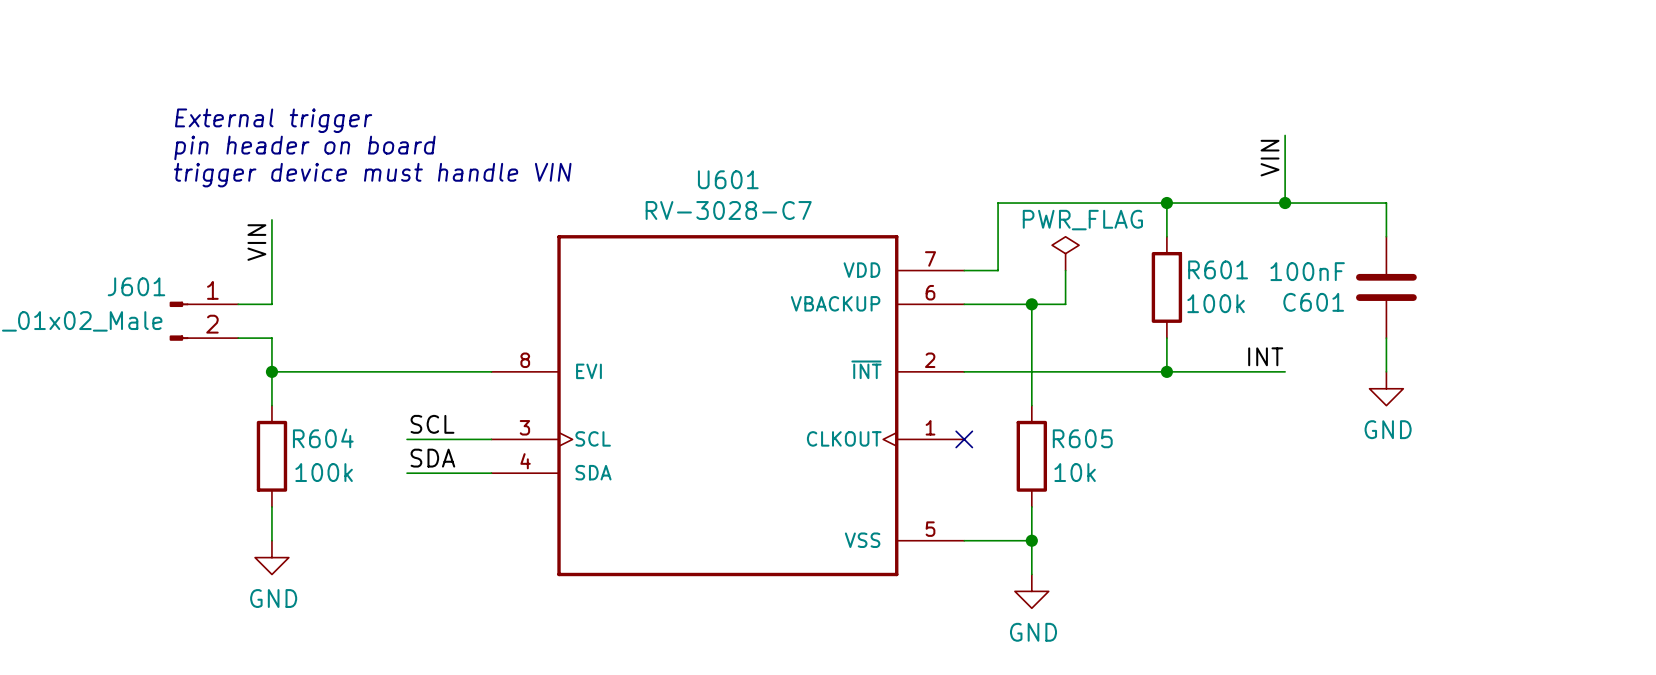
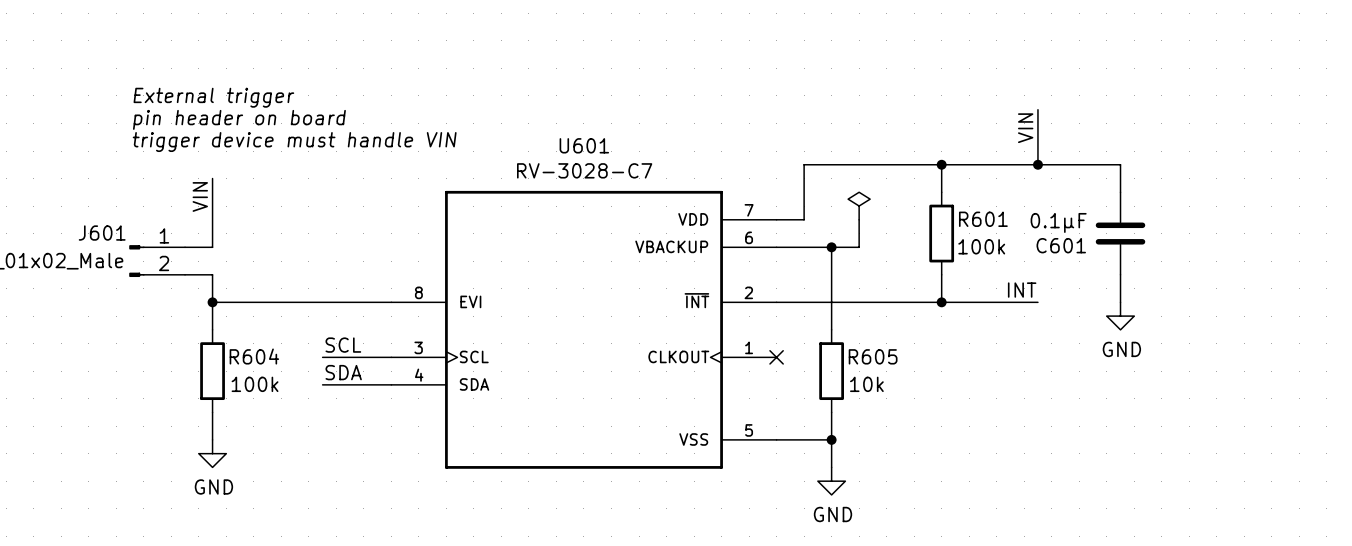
power symbol text: PWR_FLAG (1082, 220) -> none
C601 value: 100nF (1307, 271) -> 0.1µF (1058, 222)

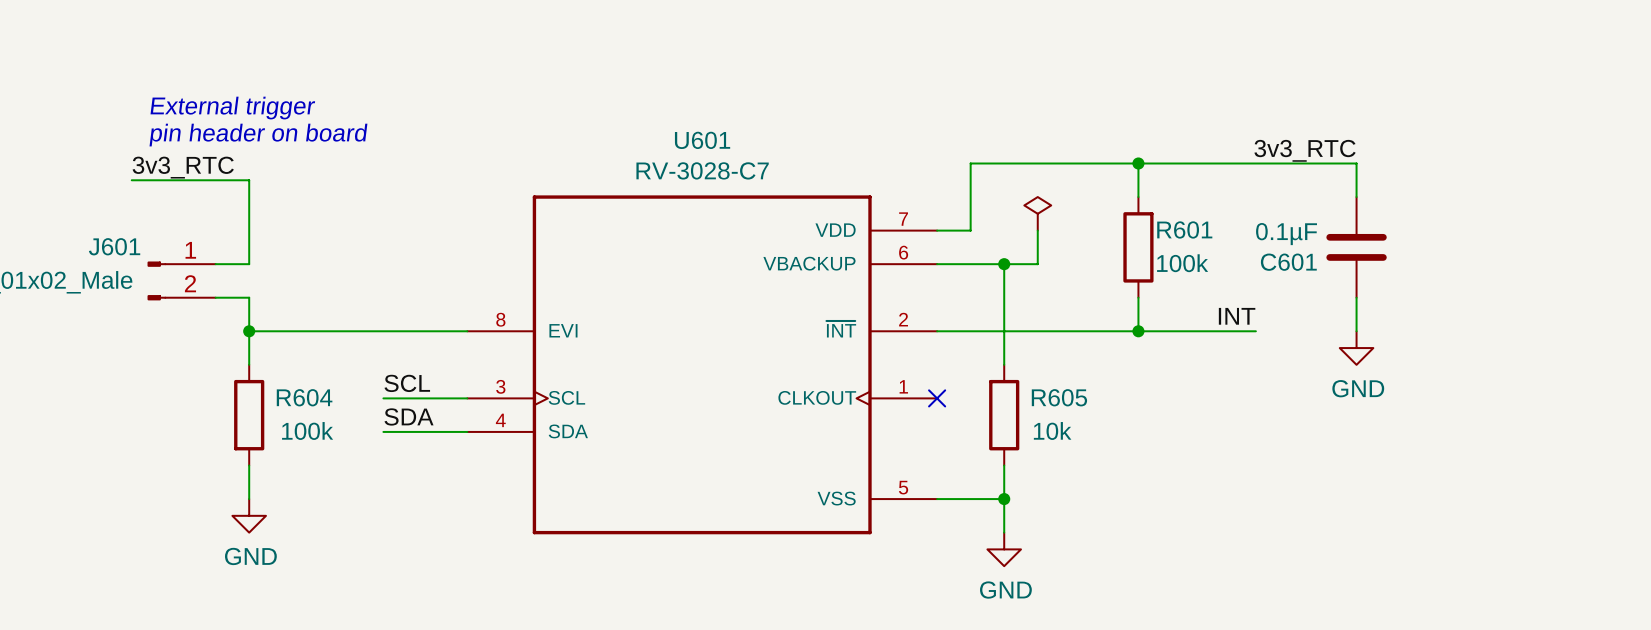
text: External trigger (213, 97) -> none
wire: (1037, 109) (1037, 164) -> none
text: pin header on board (239, 119) -> External trigger (232, 108)
label: VIN (1025, 128) -> none
text: trigger device must handle VIN (294, 142) -> pin header on board (258, 135)
label: none -> 3v3_RTC (1305, 150)
junction: (1037, 164) -> none
label: none -> 3v3_RTC (183, 167)
wire: none -> (131, 180) (249, 180)
label: VIN (200, 196) -> none

